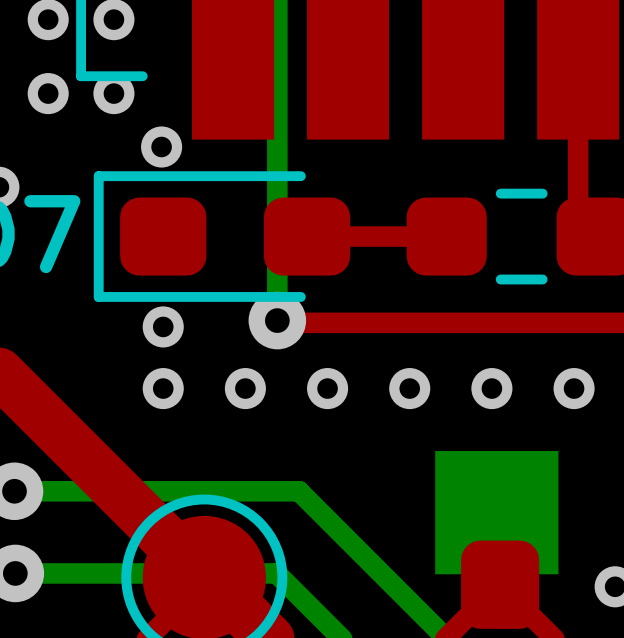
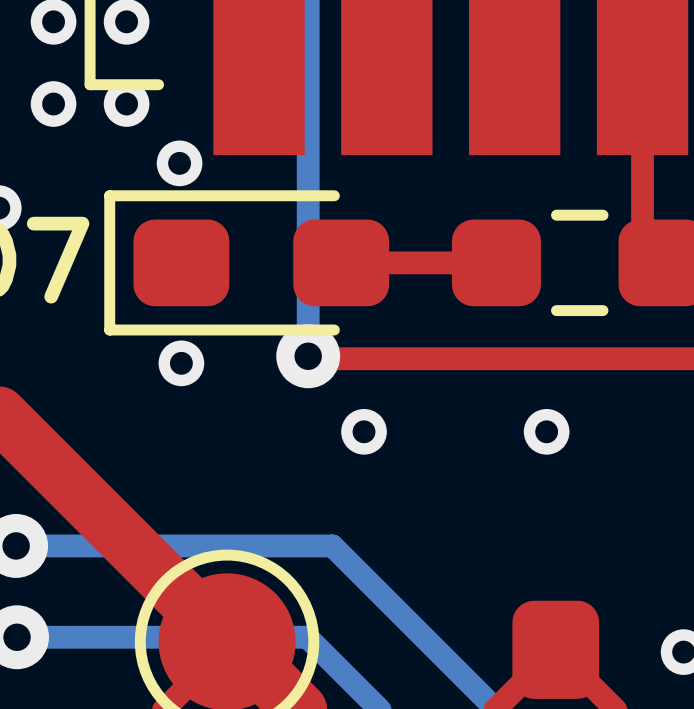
via: (163, 388) -> none
via: (245, 388) -> none
via: (409, 388) -> none
via: (574, 388) -> none
part: (496, 512) -> none

